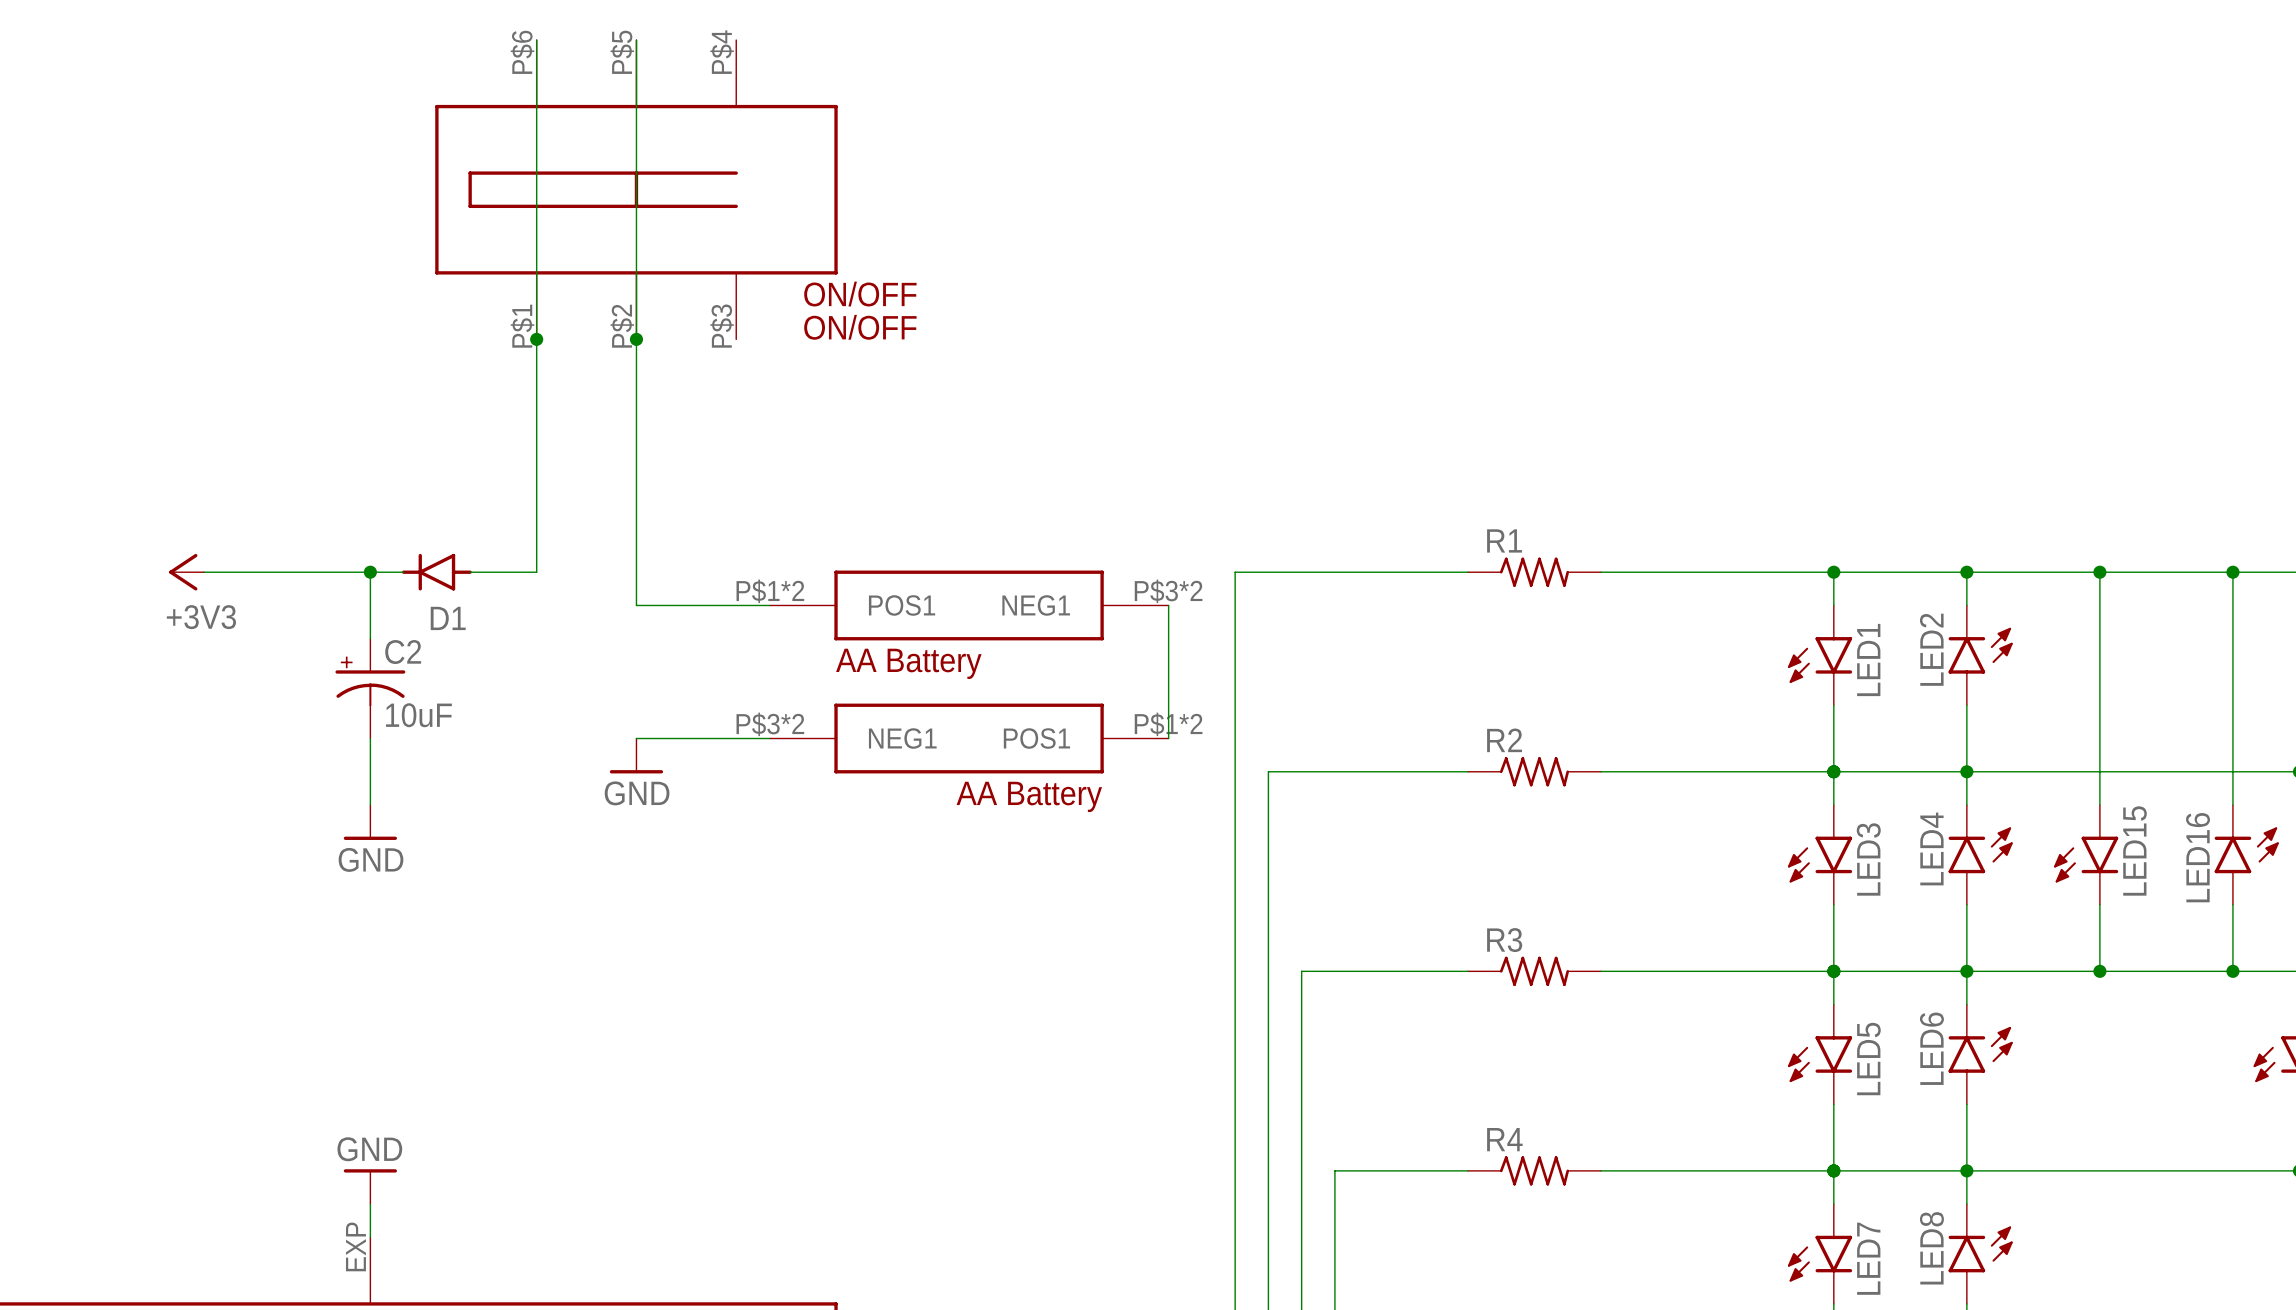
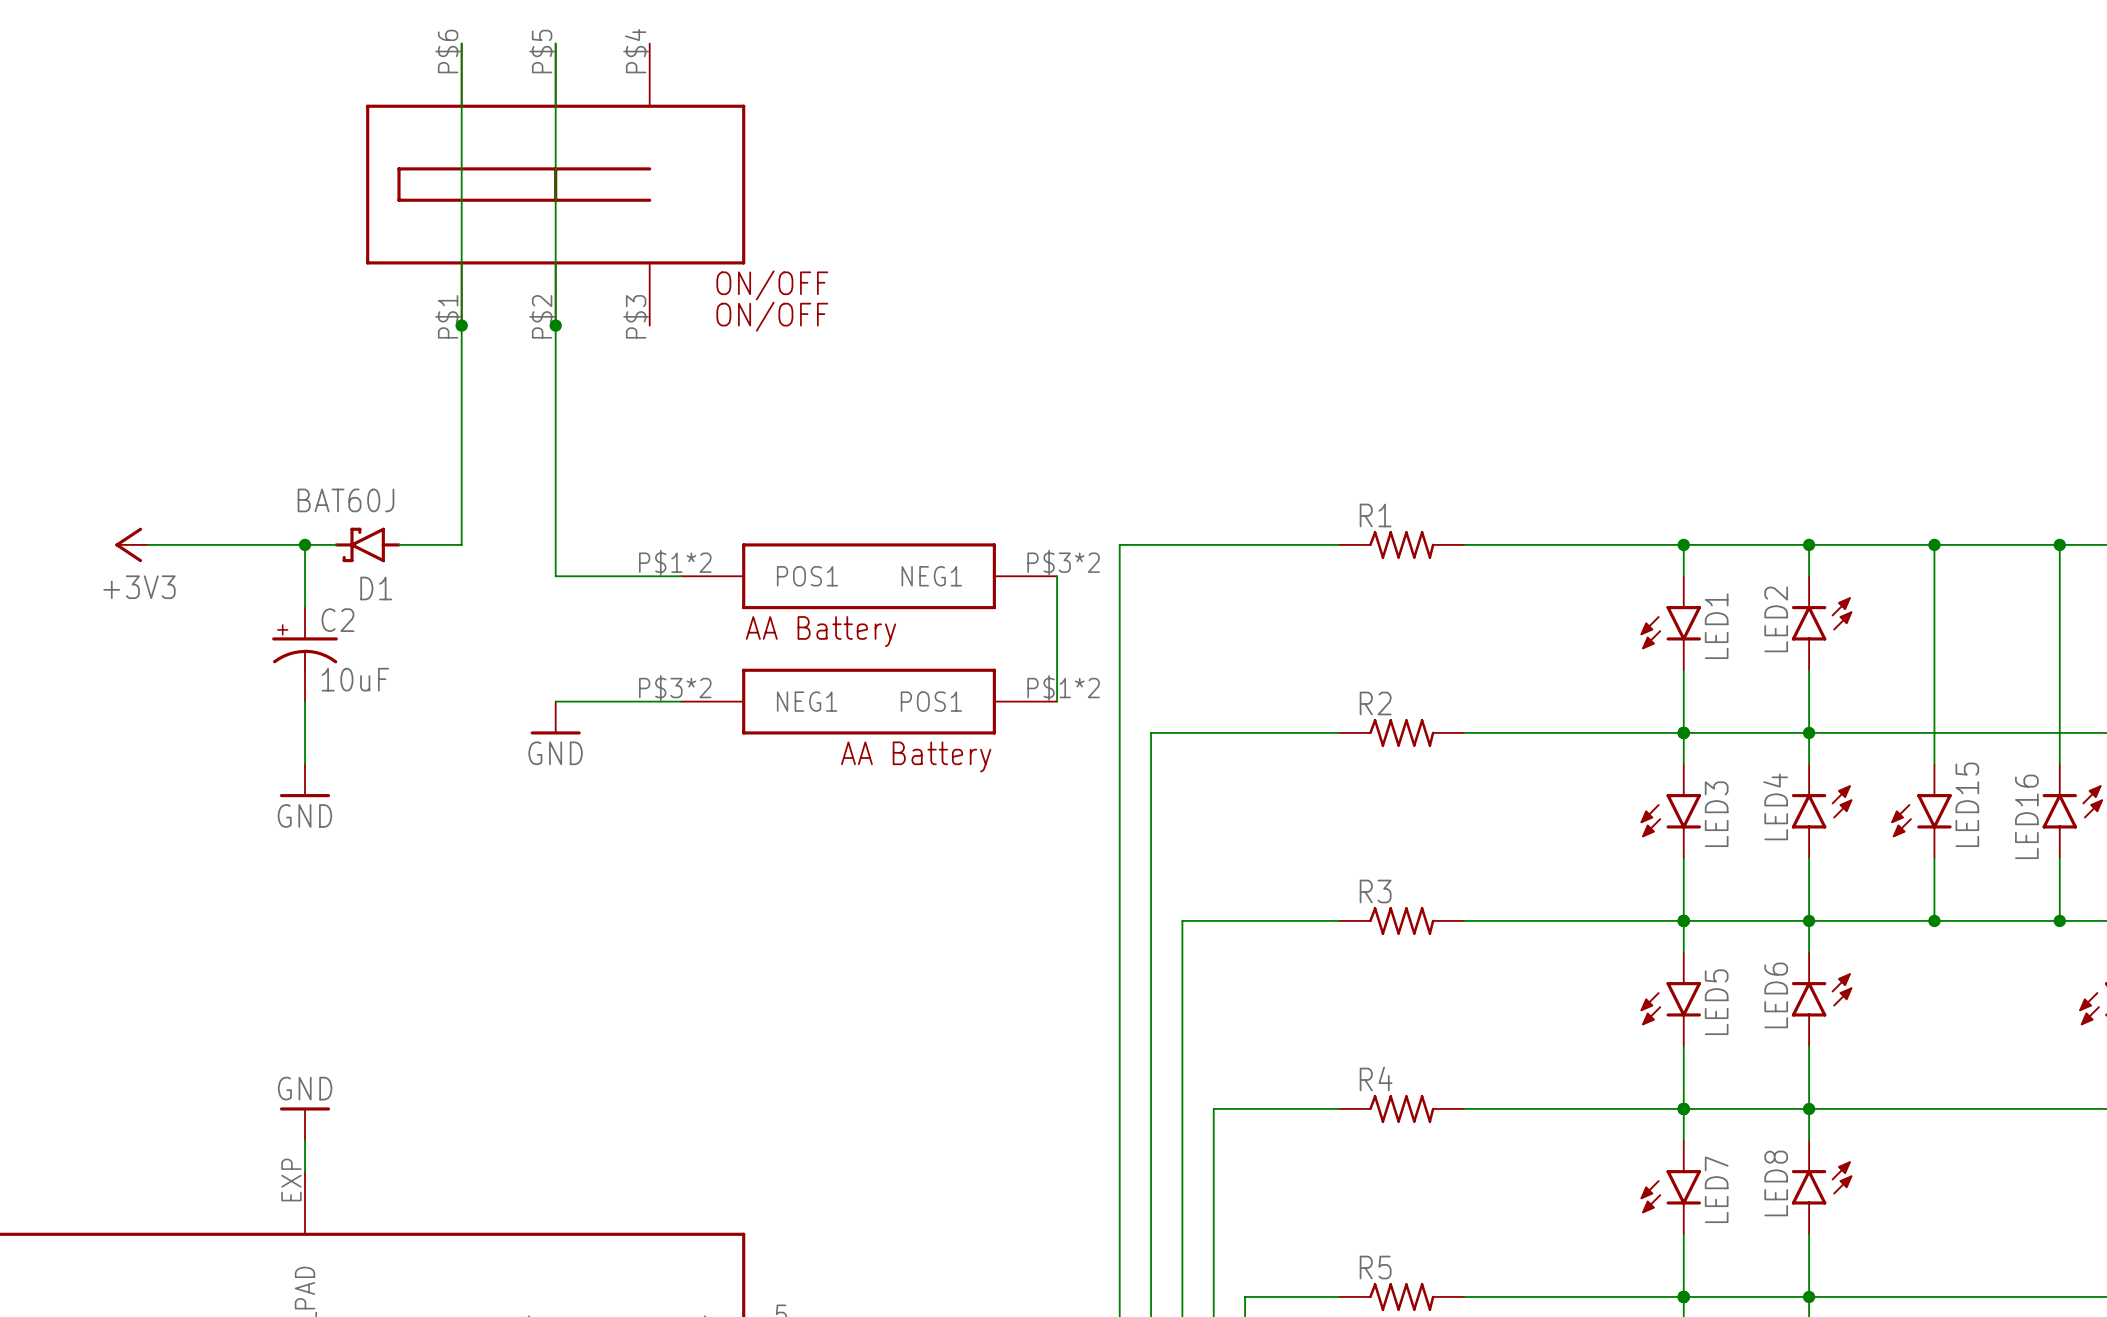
D1 value: none -> BAT60J (345, 500)
D1 symbol: [401, 553, 472, 591] -> [334, 527, 401, 563]

